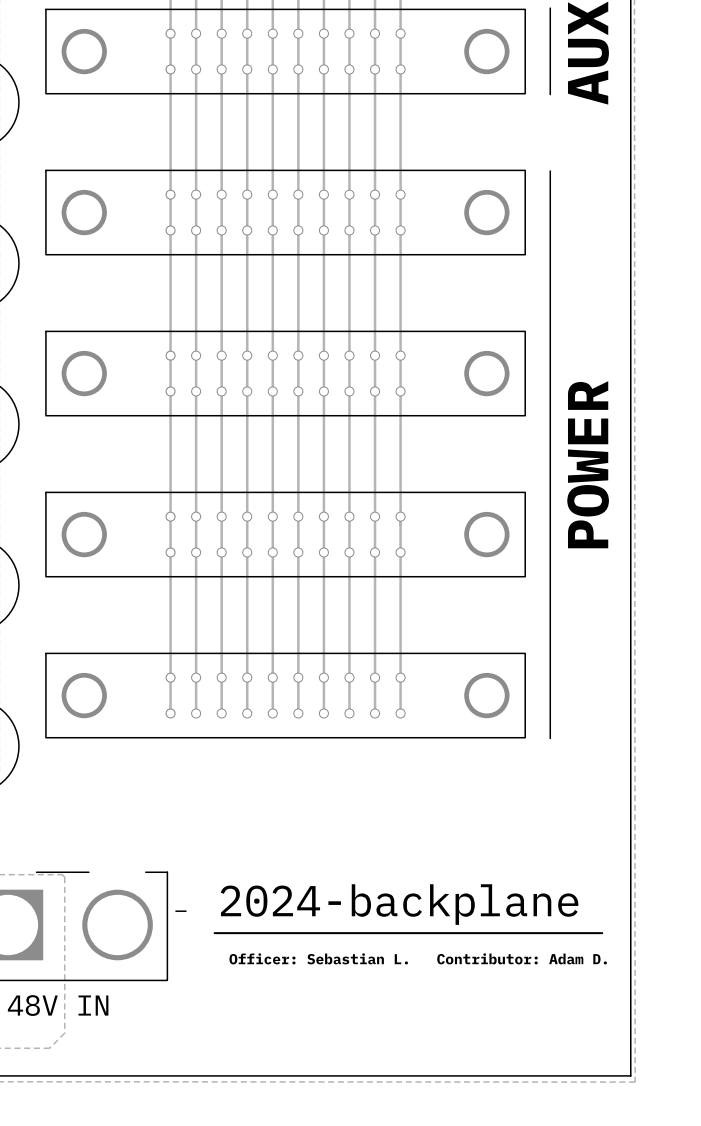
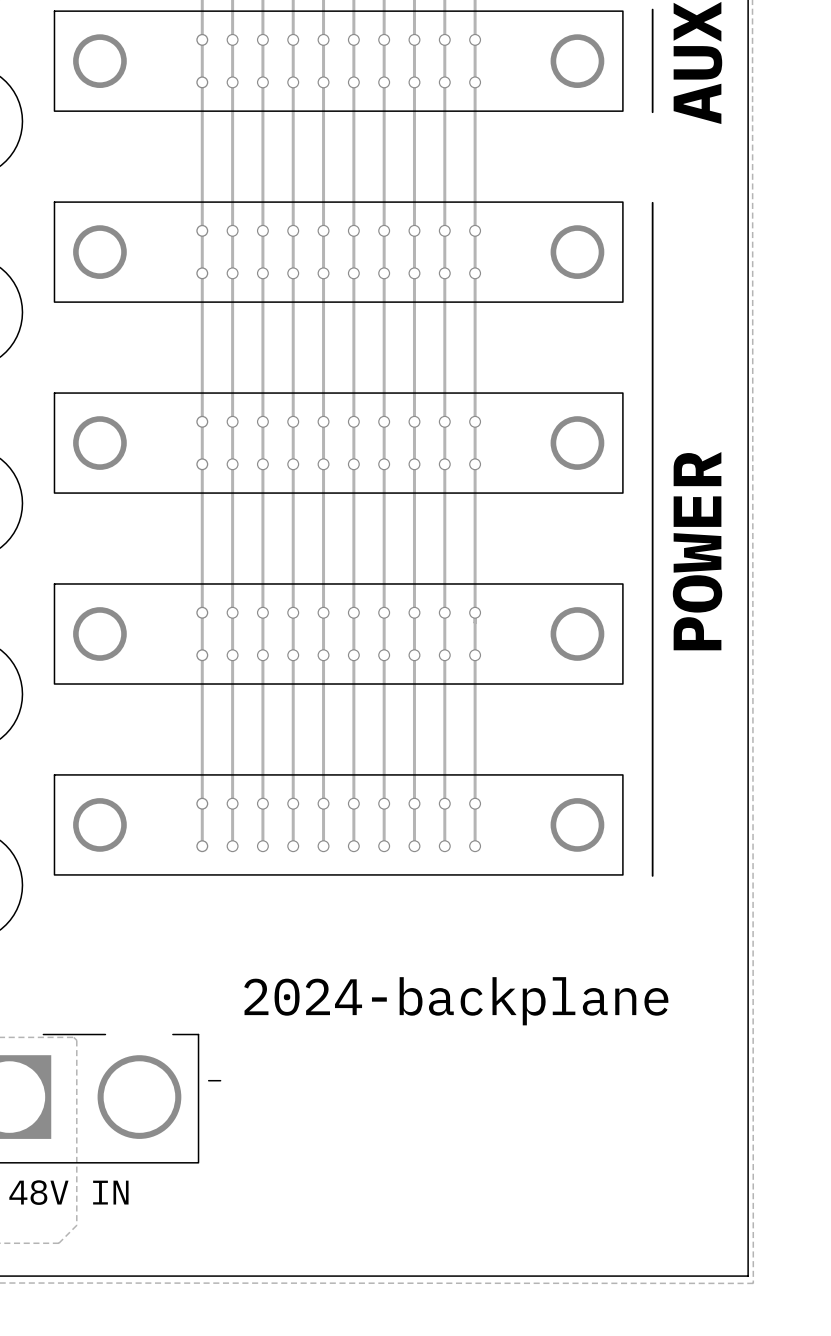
text position: 2024-backplane (399, 904) -> 2024-backplane (456, 1001)
line: (214, 933) (602, 933) -> none
text: Officer: Sebastian L. Contributor: Adam D. (418, 958) -> none

